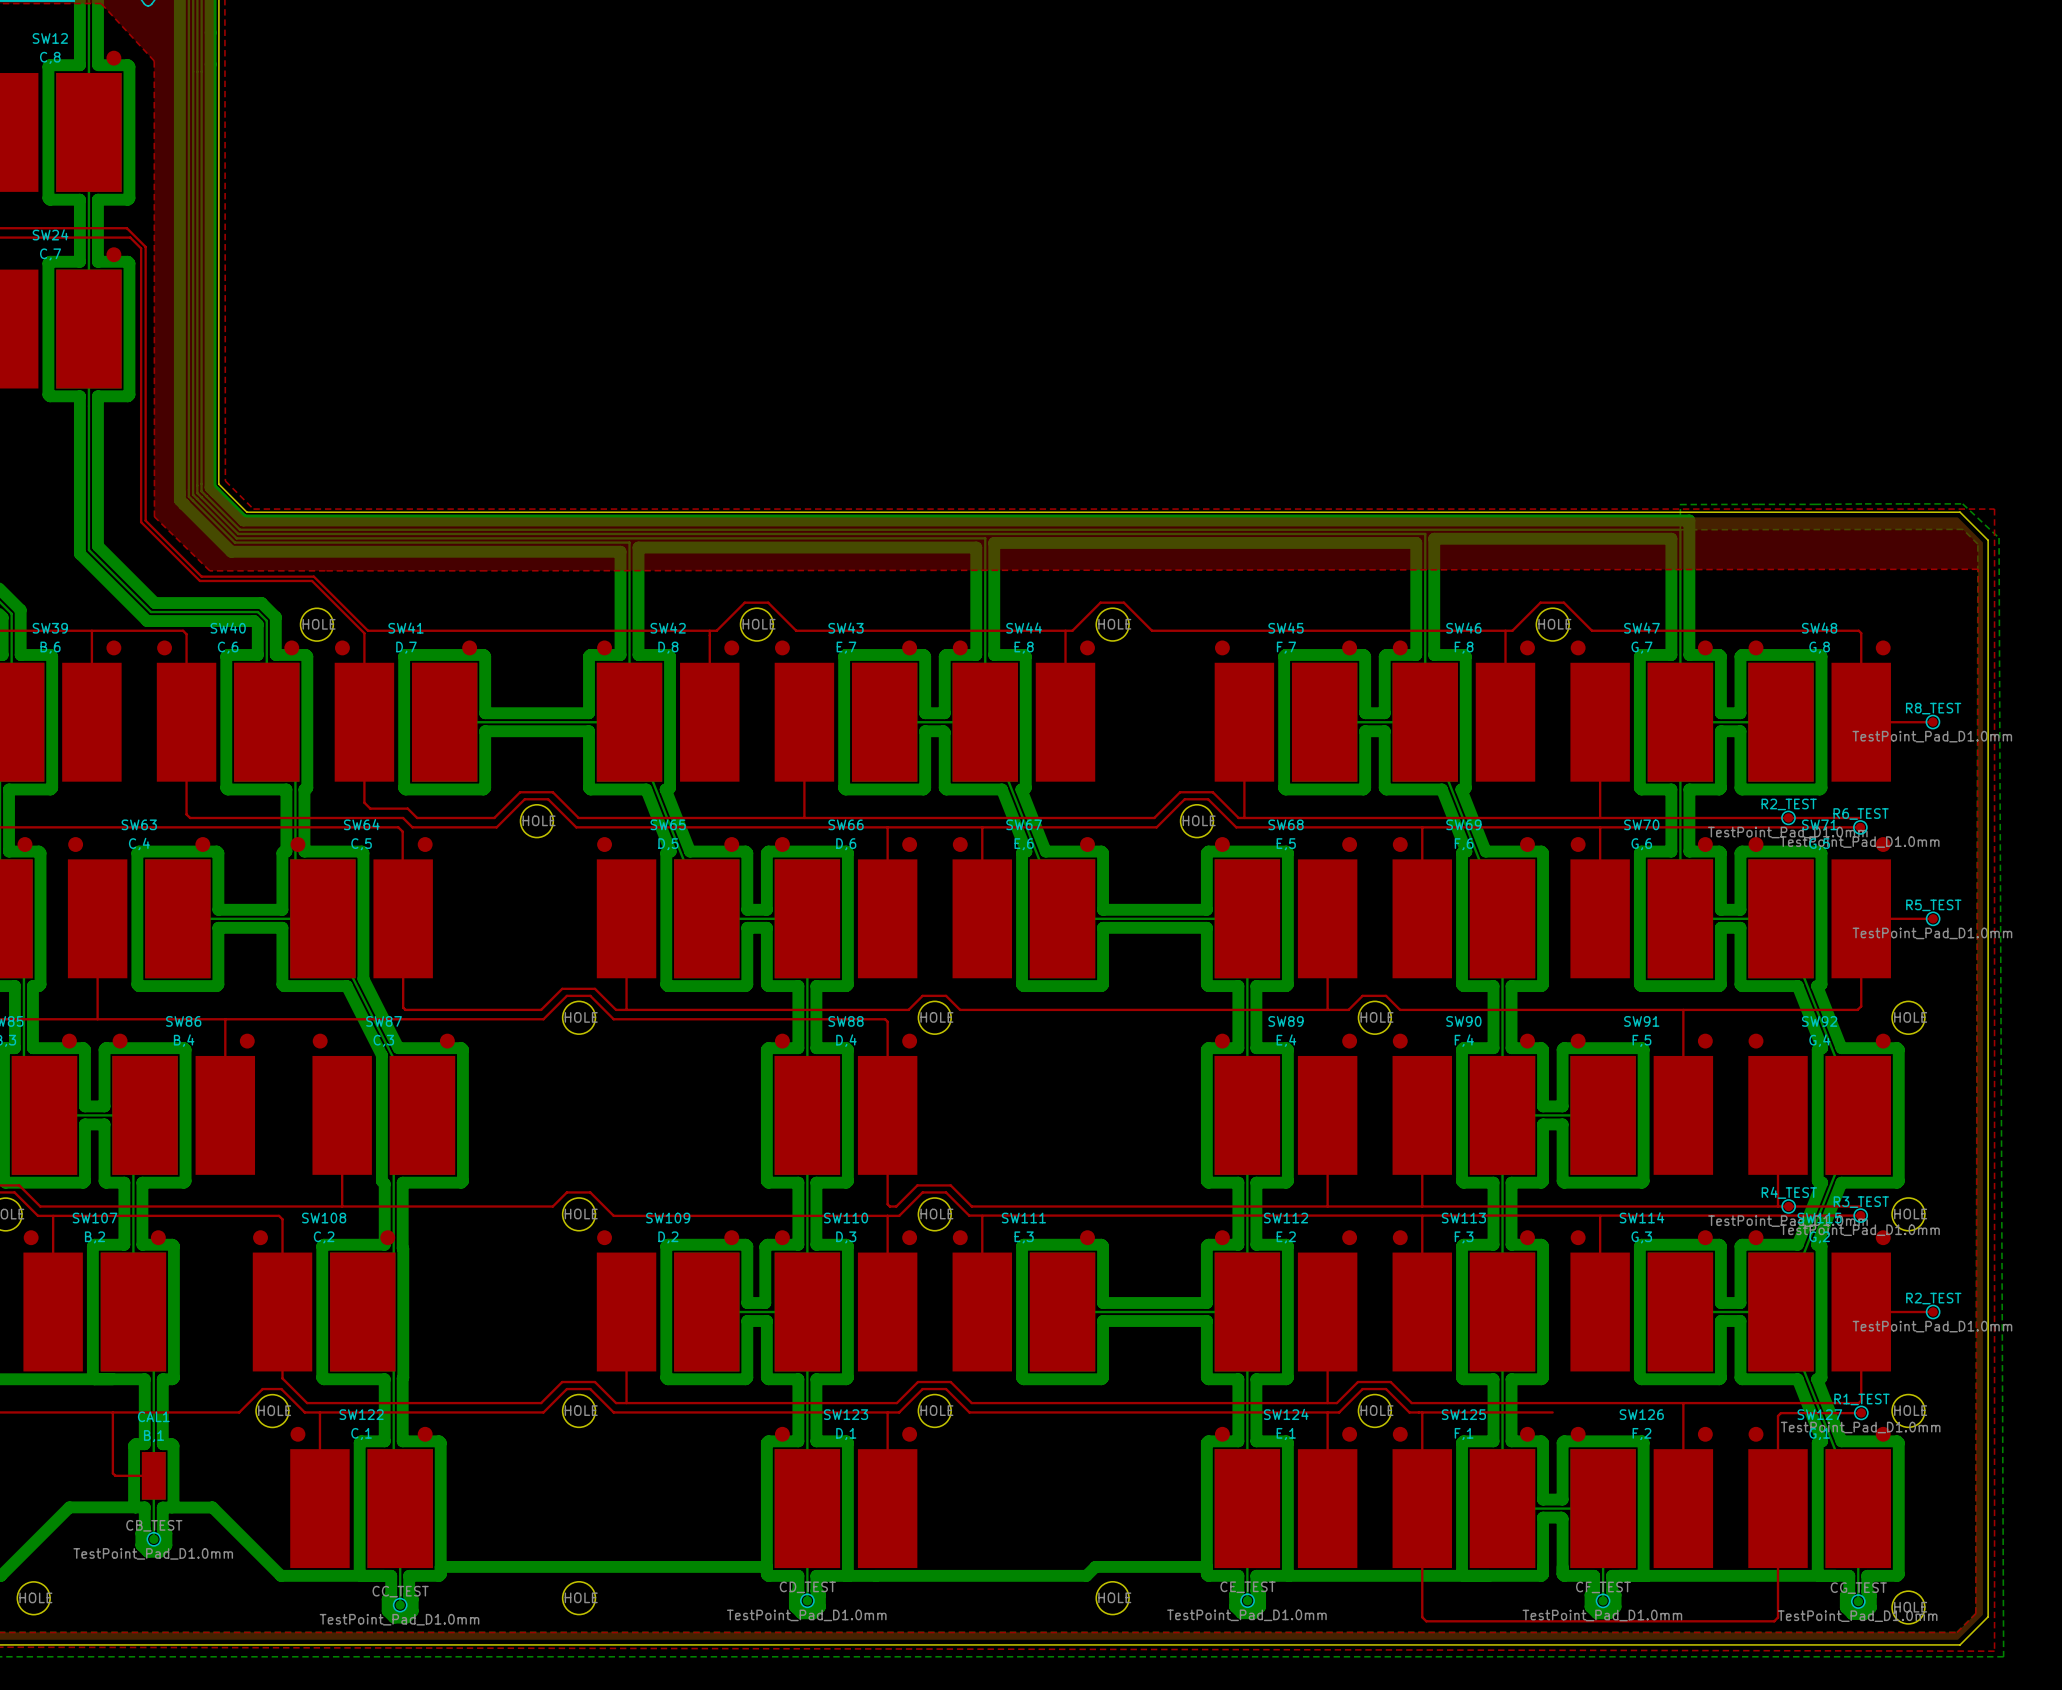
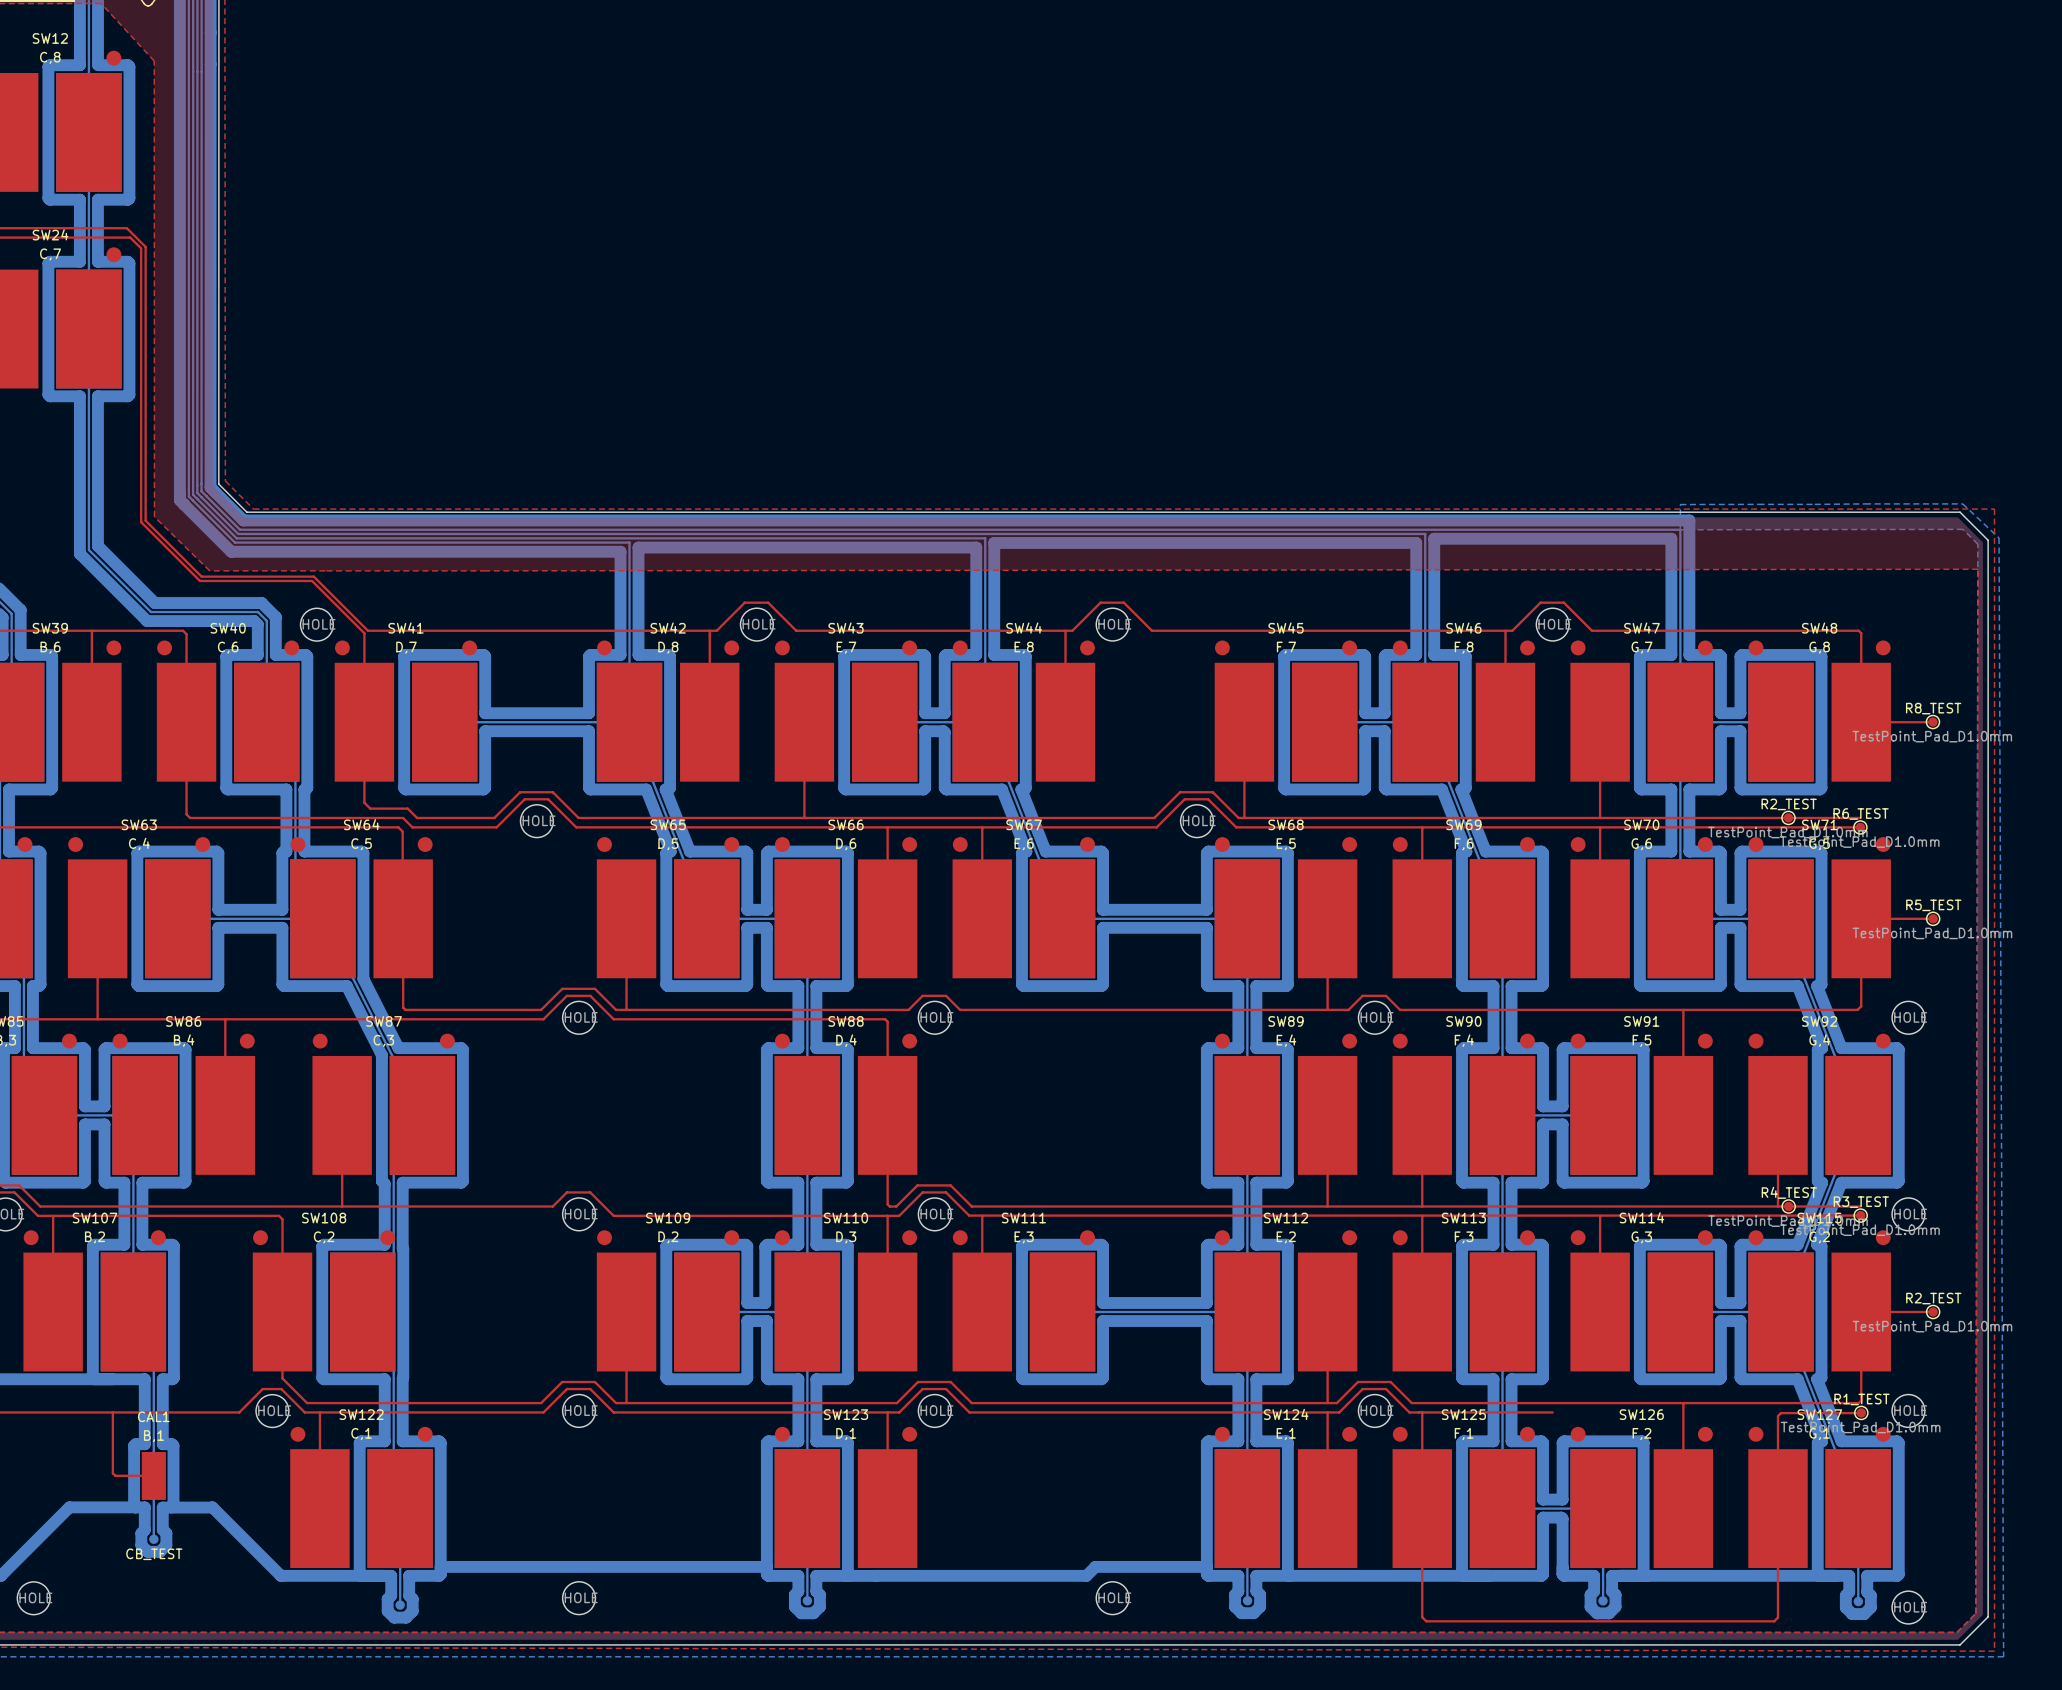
CB_TEST side: top (153, 1539) -> bottom (153, 1539)
CD_TEST side: top (807, 1600) -> bottom (807, 1600)
CE_TEST side: top (1247, 1600) -> bottom (1247, 1600)
CF_TEST side: top (1603, 1600) -> bottom (1603, 1600)
CG_TEST side: top (1858, 1601) -> bottom (1858, 1601)
CC_TEST side: top (400, 1605) -> bottom (400, 1605)

